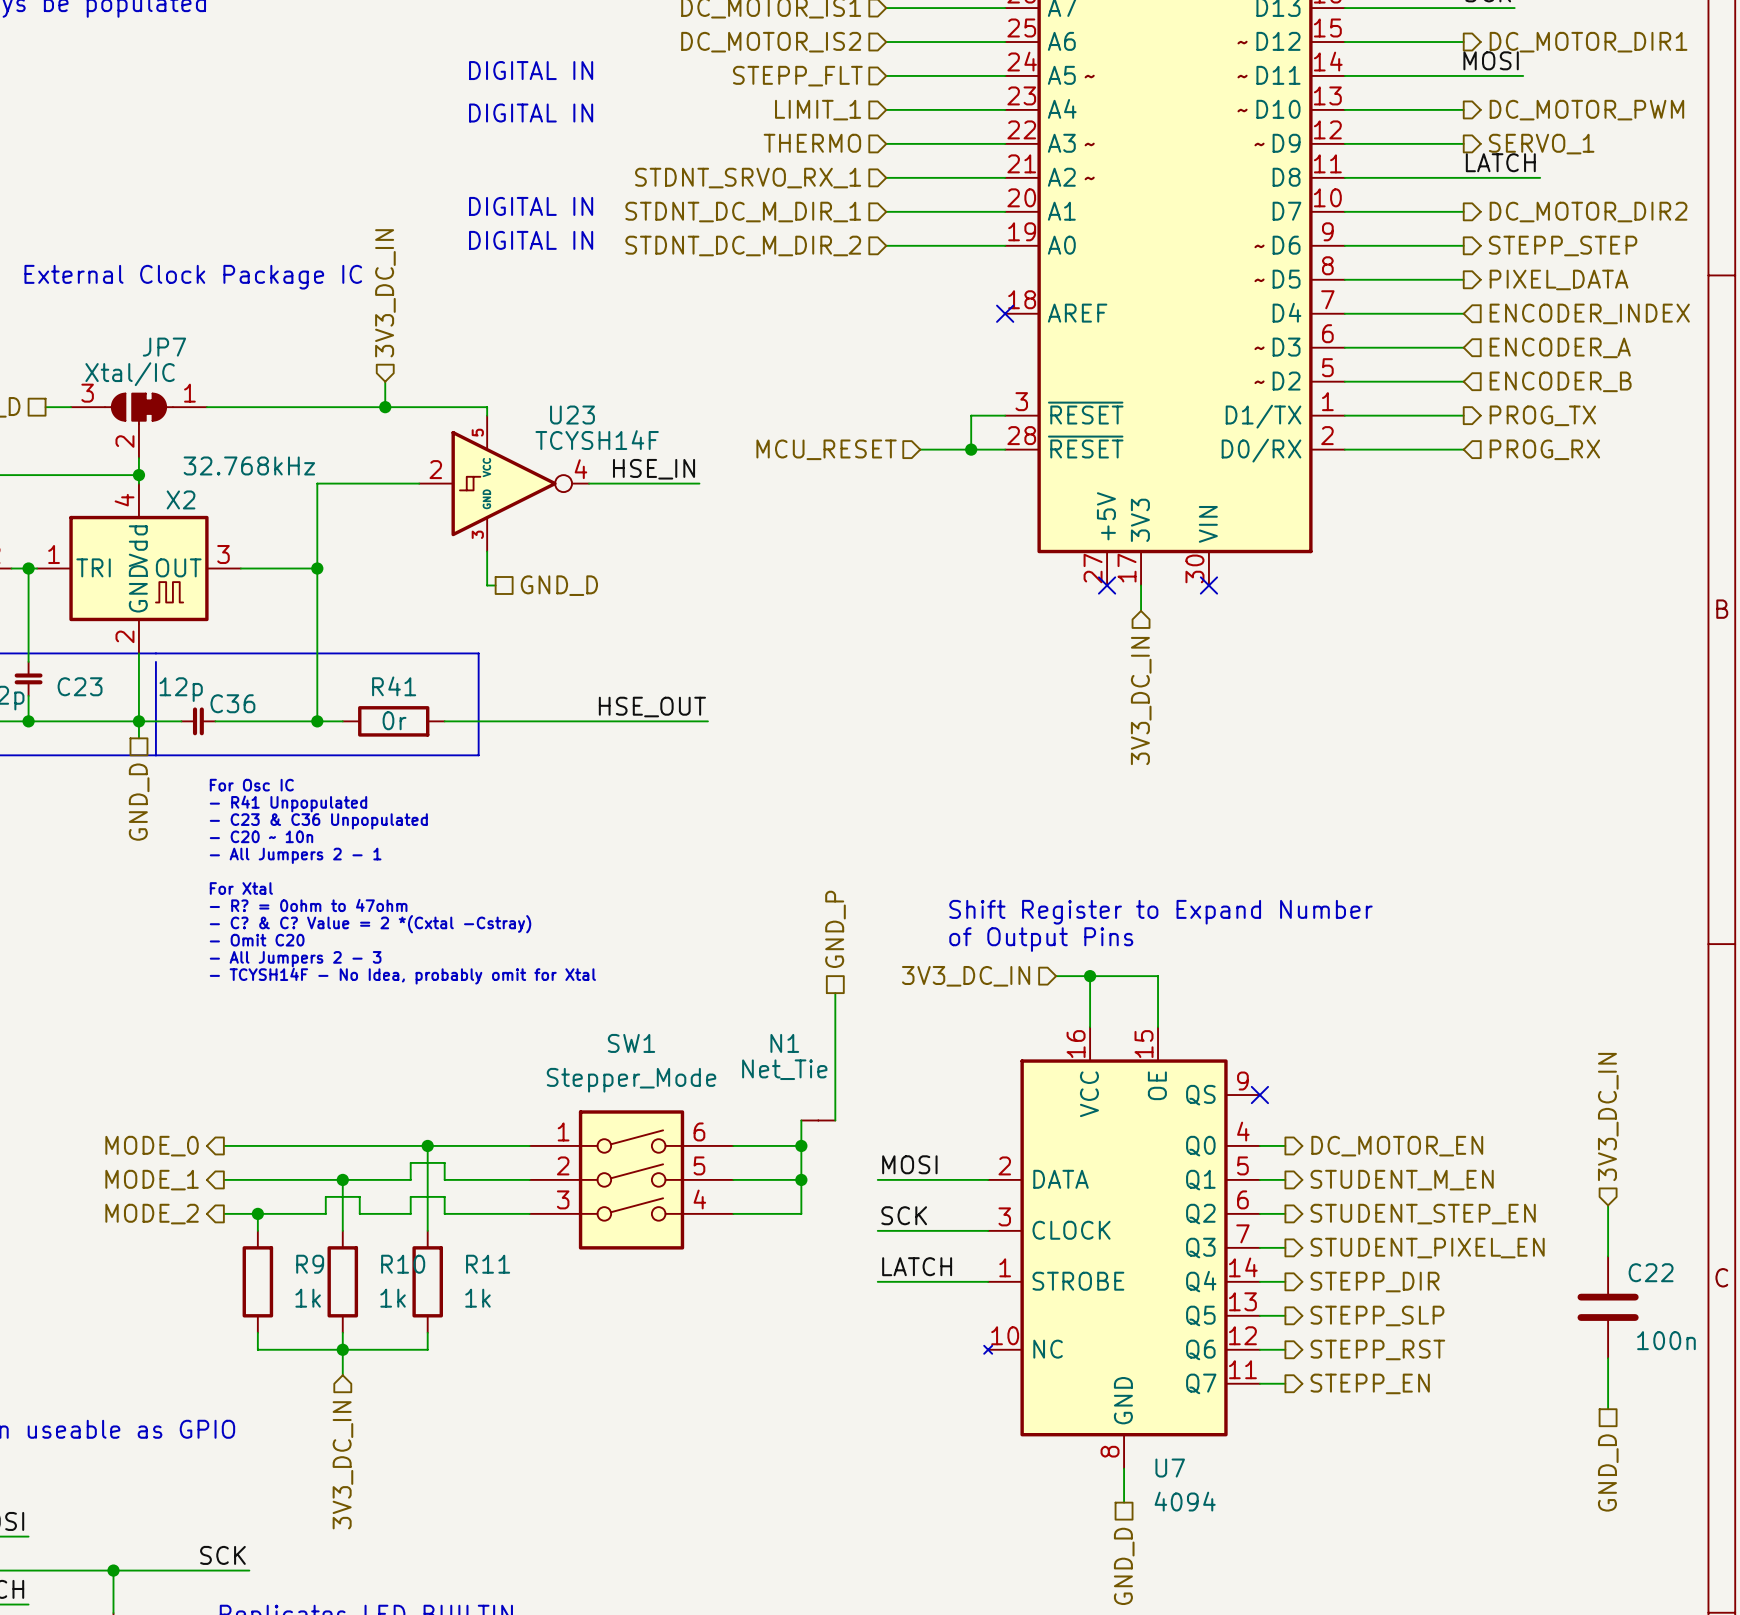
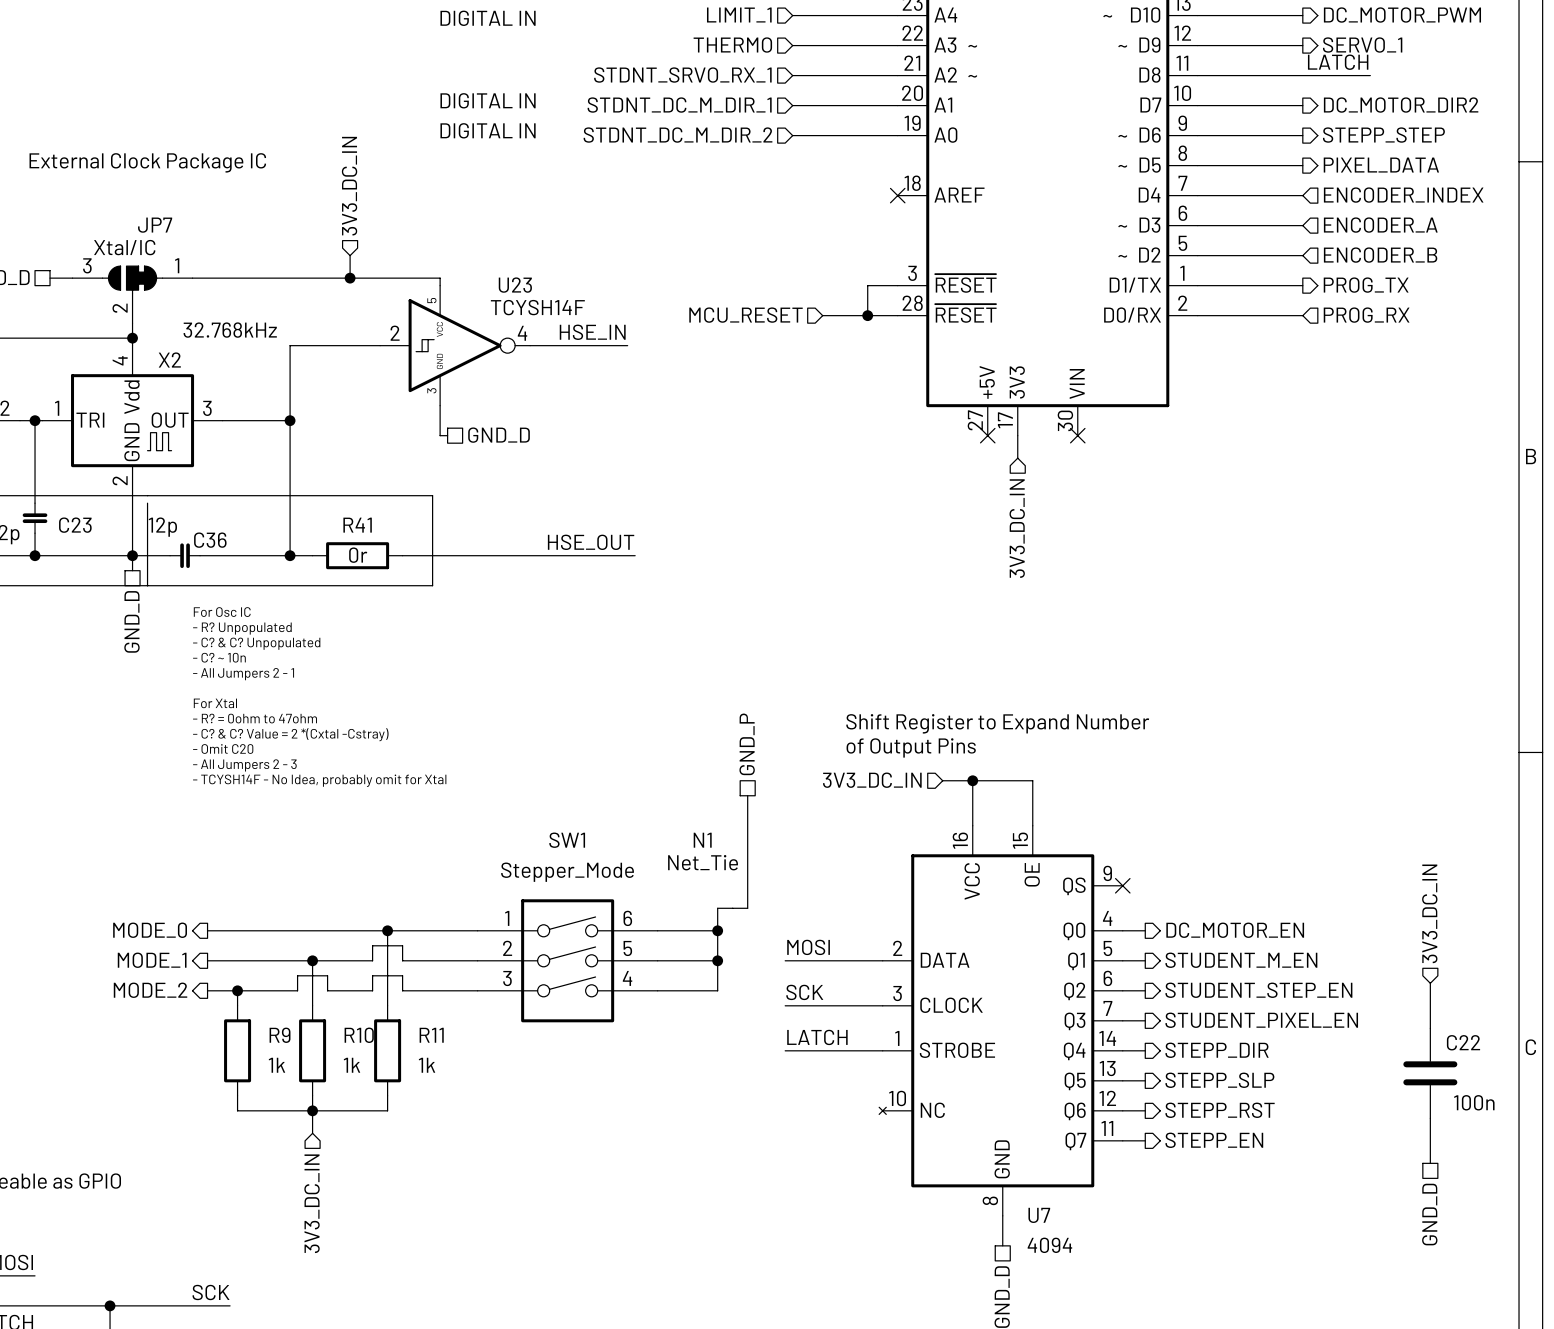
text: - R41 Unpopulated (288, 803) -> - R? Unpopulated (242, 628)
text: - C23 & C36 Unpopulated (318, 821) -> - C? & C? Unpopulated (256, 643)
text: - C20 ~ 10n (261, 836) -> - C? ~ 10n (219, 657)

